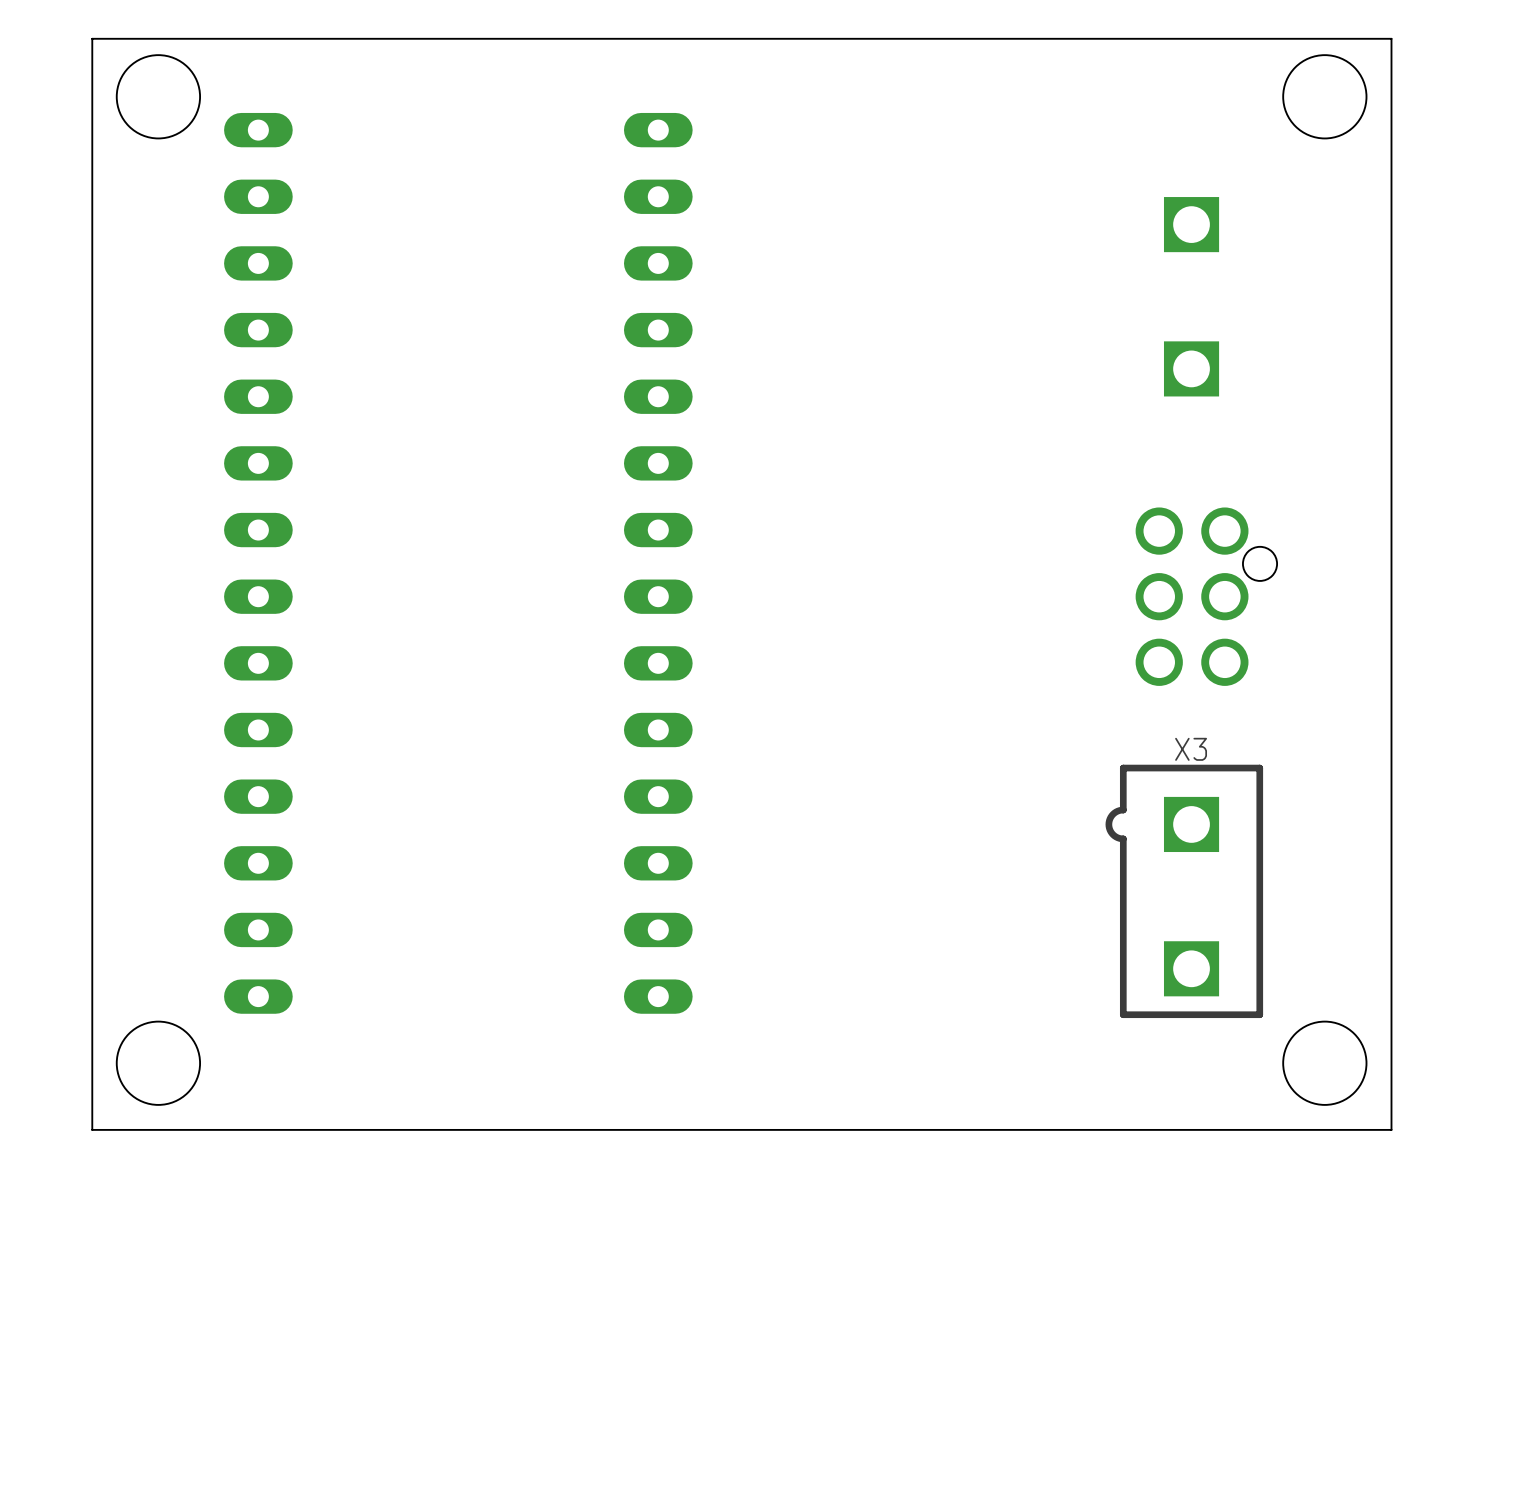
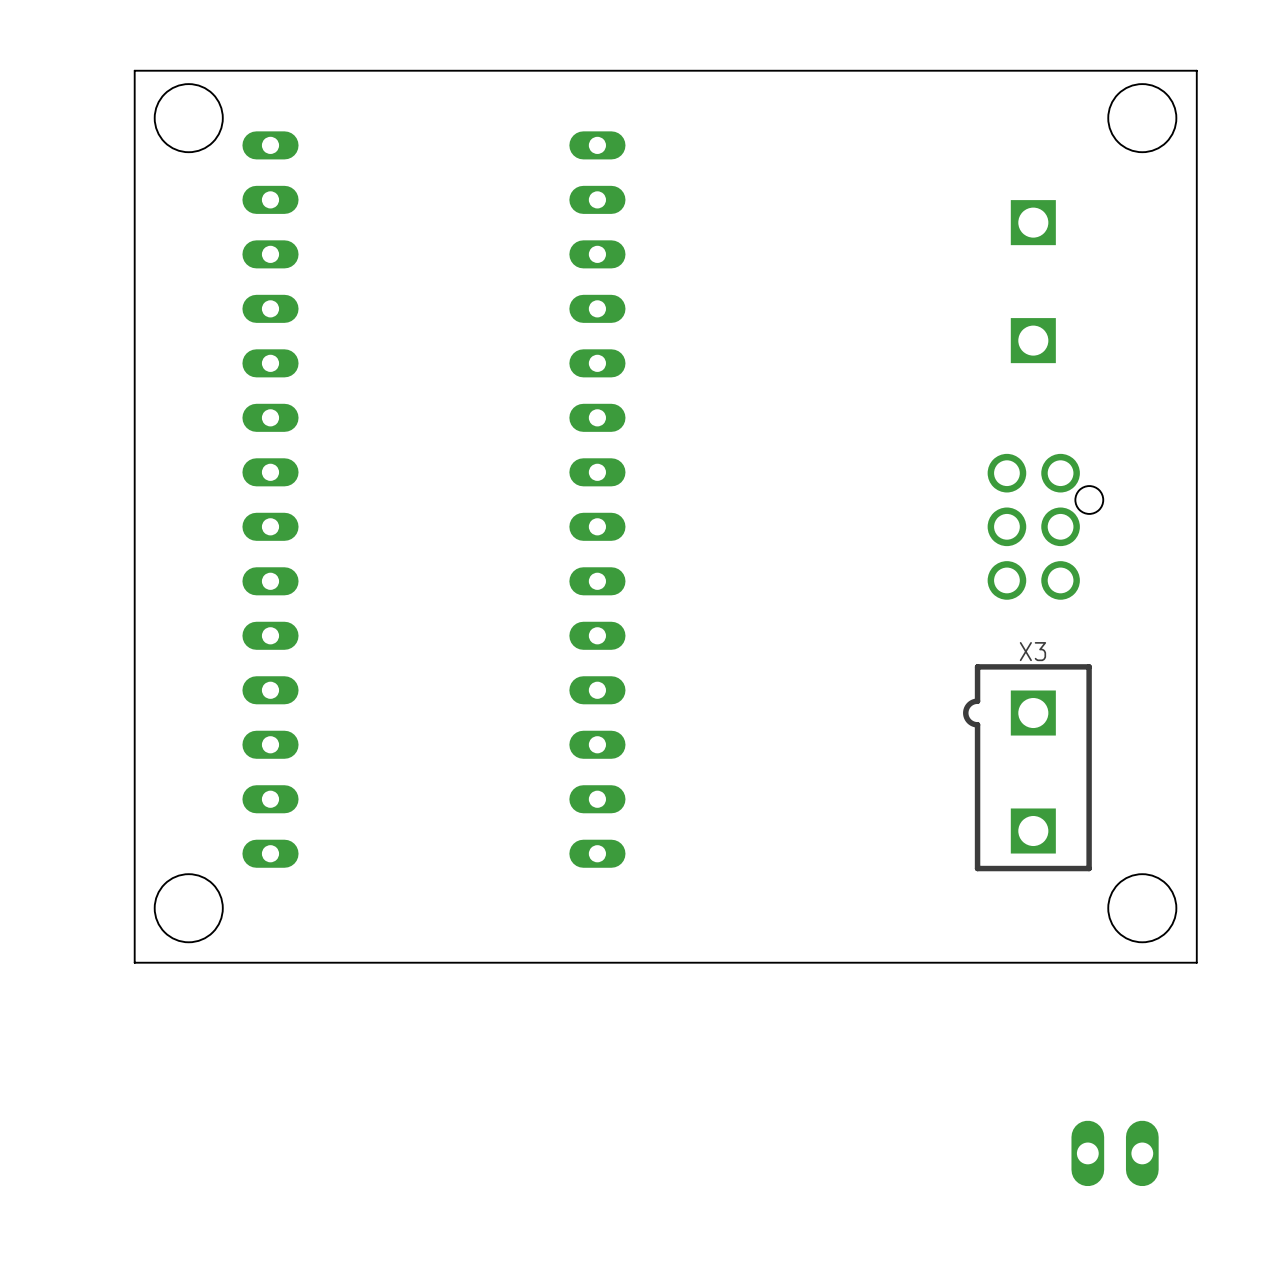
part: none -> (1115, 1153)

